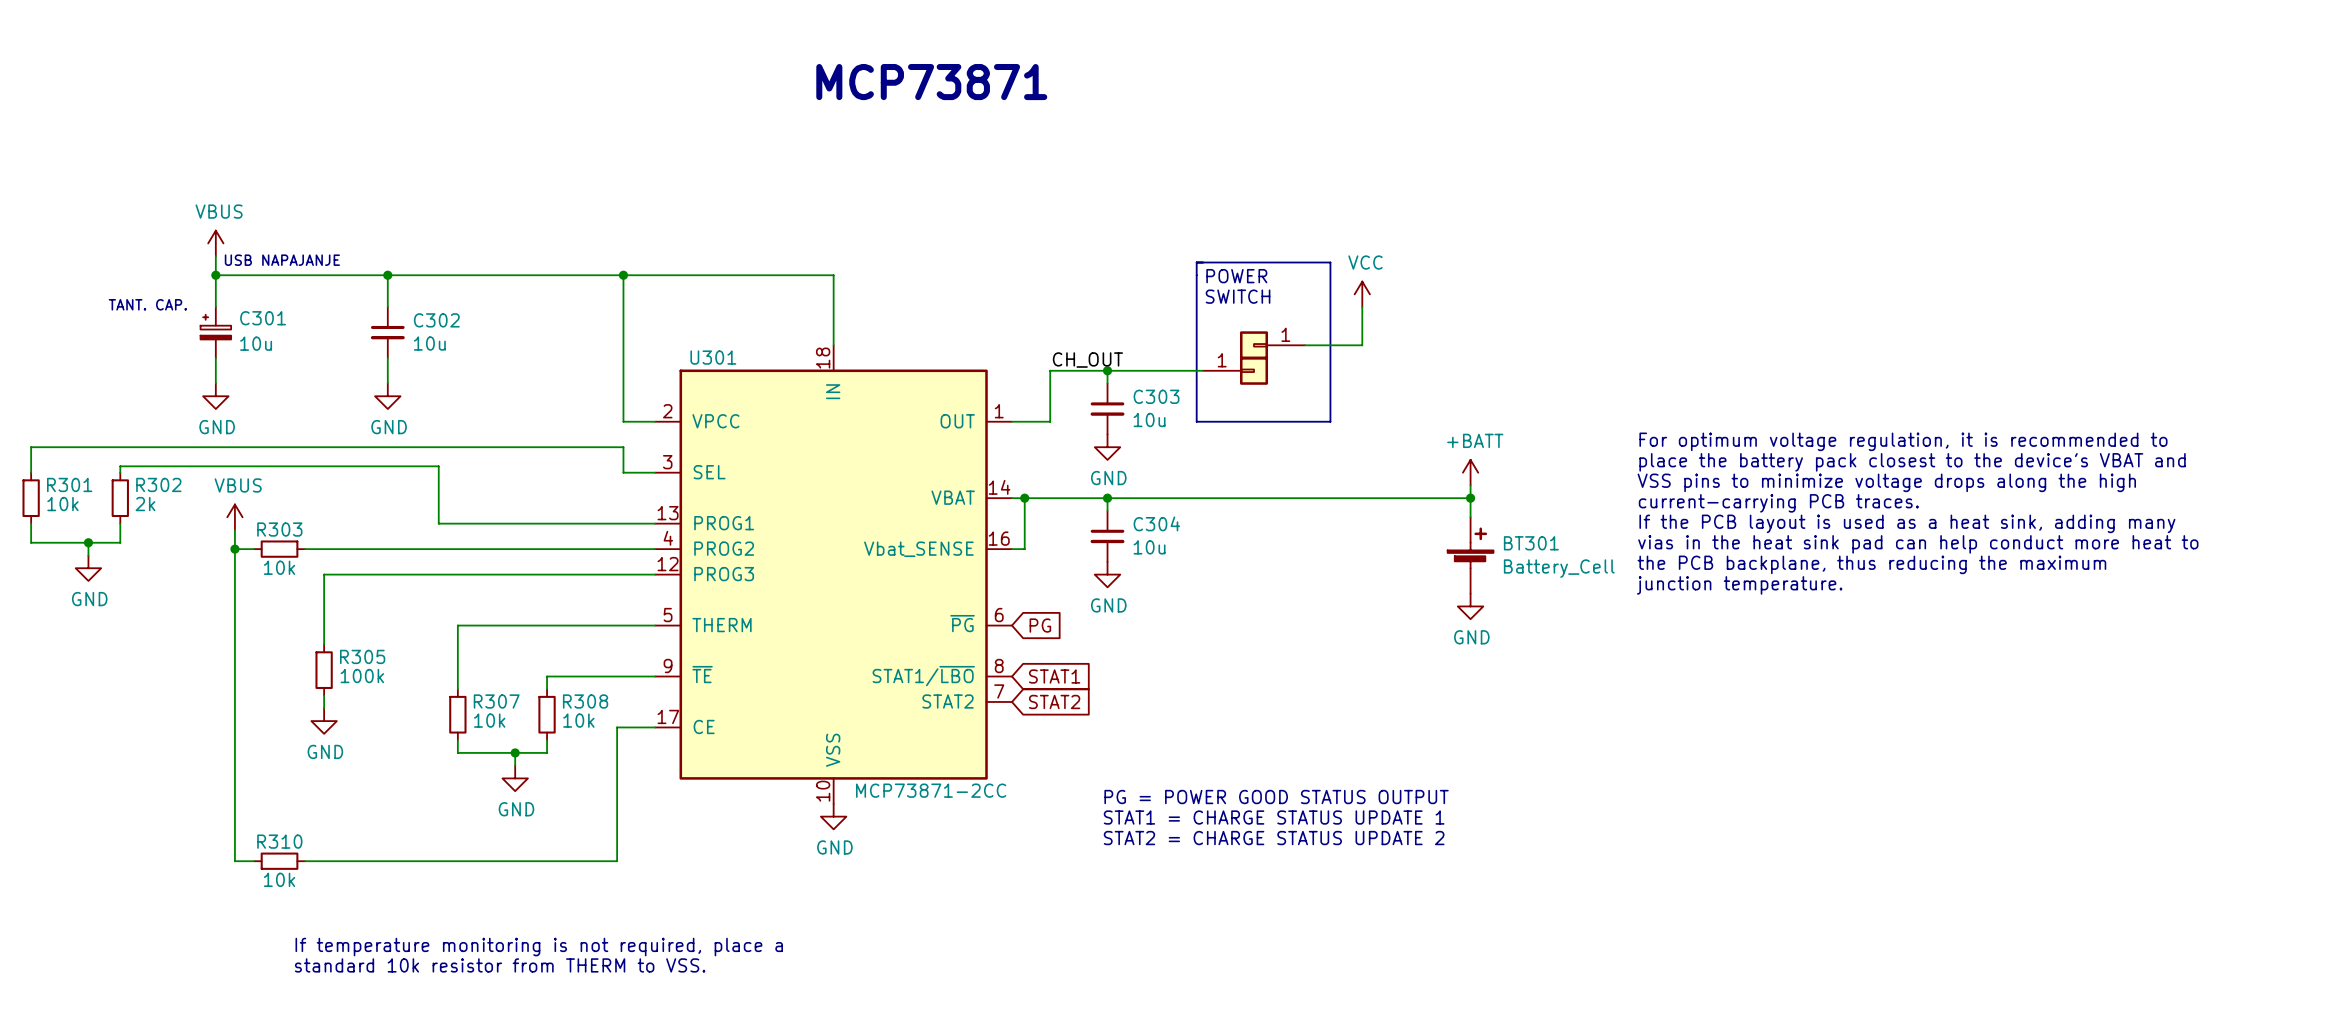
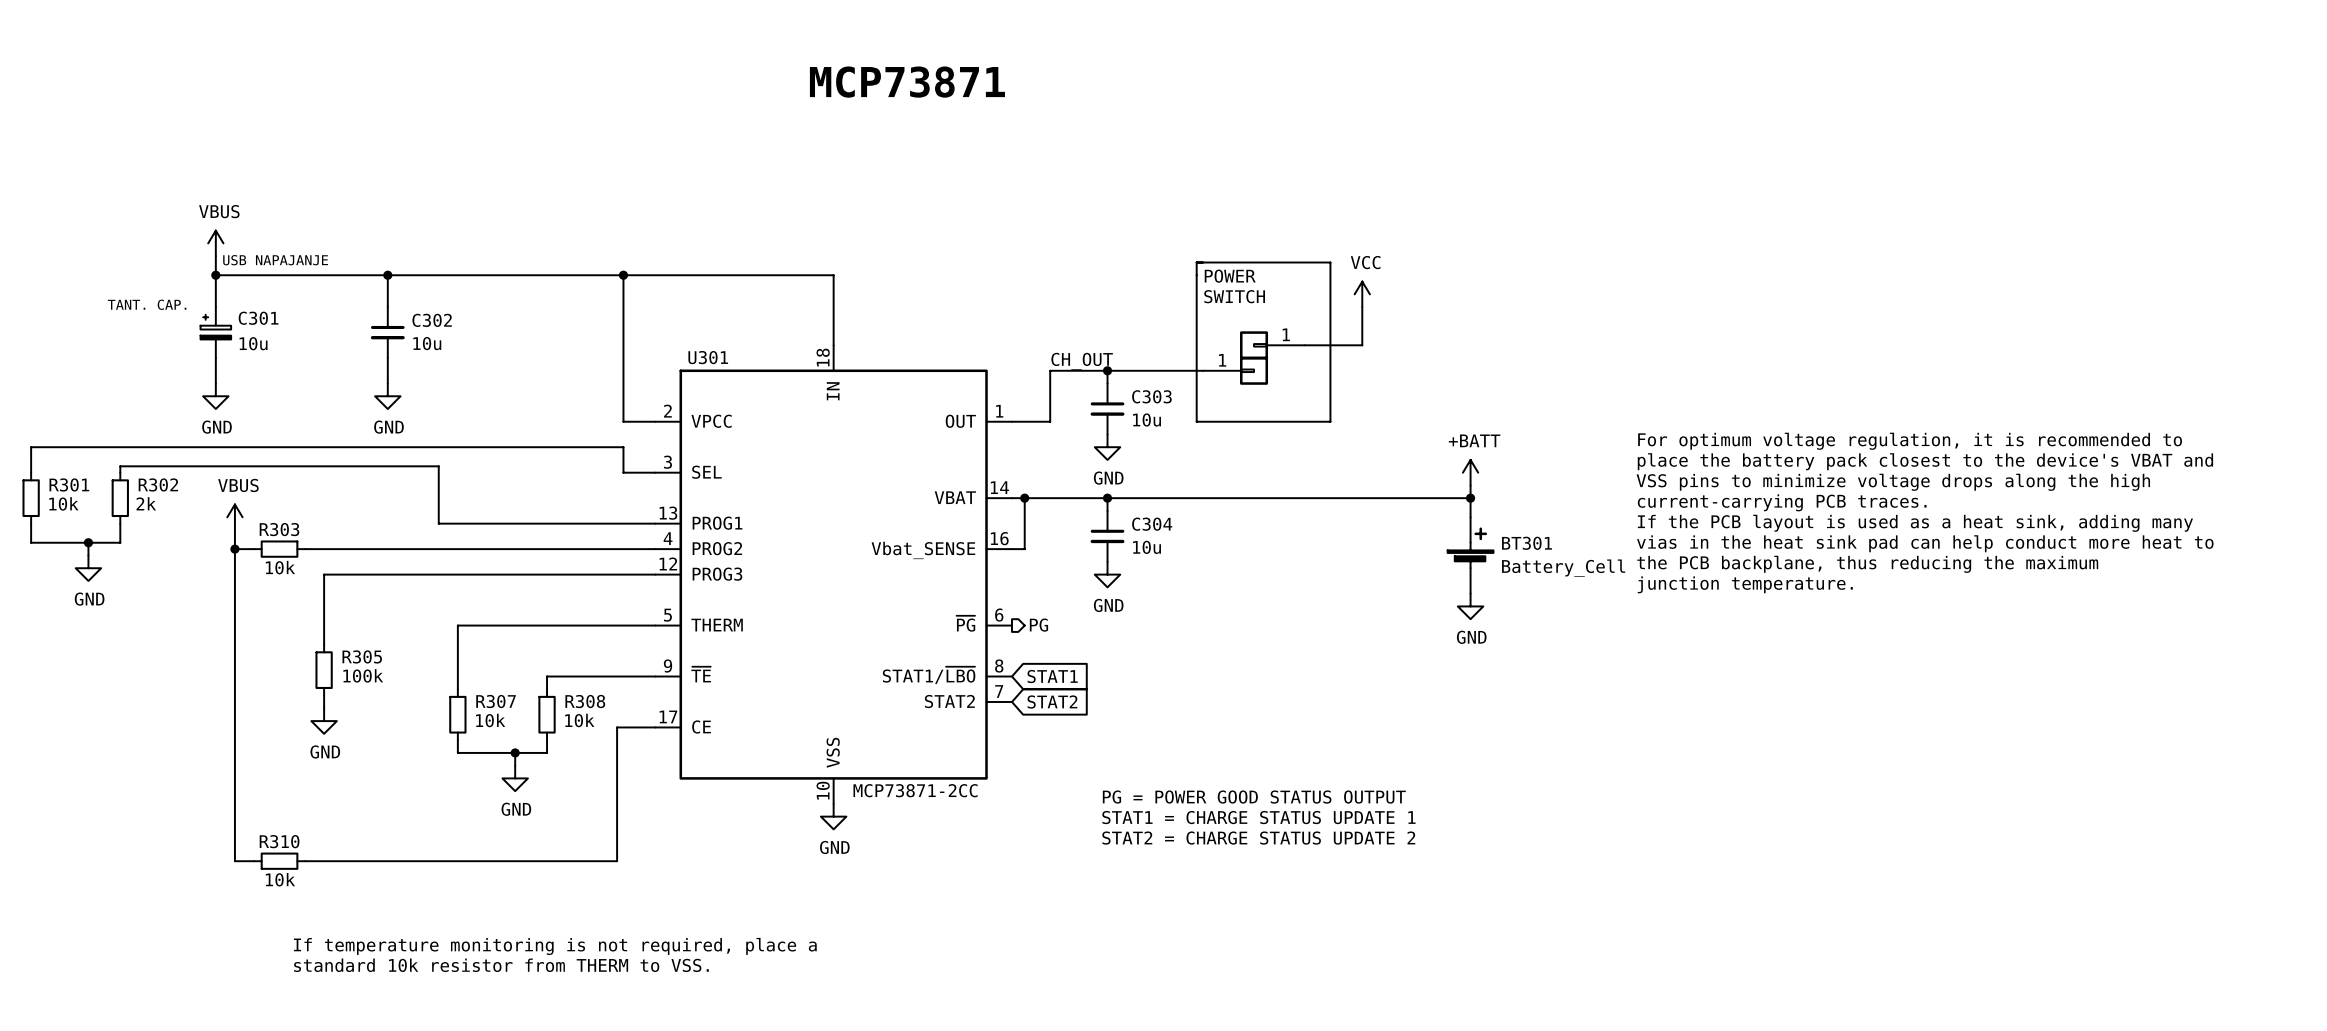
global label: PG (1040, 625) -> none
hierarchical label: none -> PG (1038, 625)

